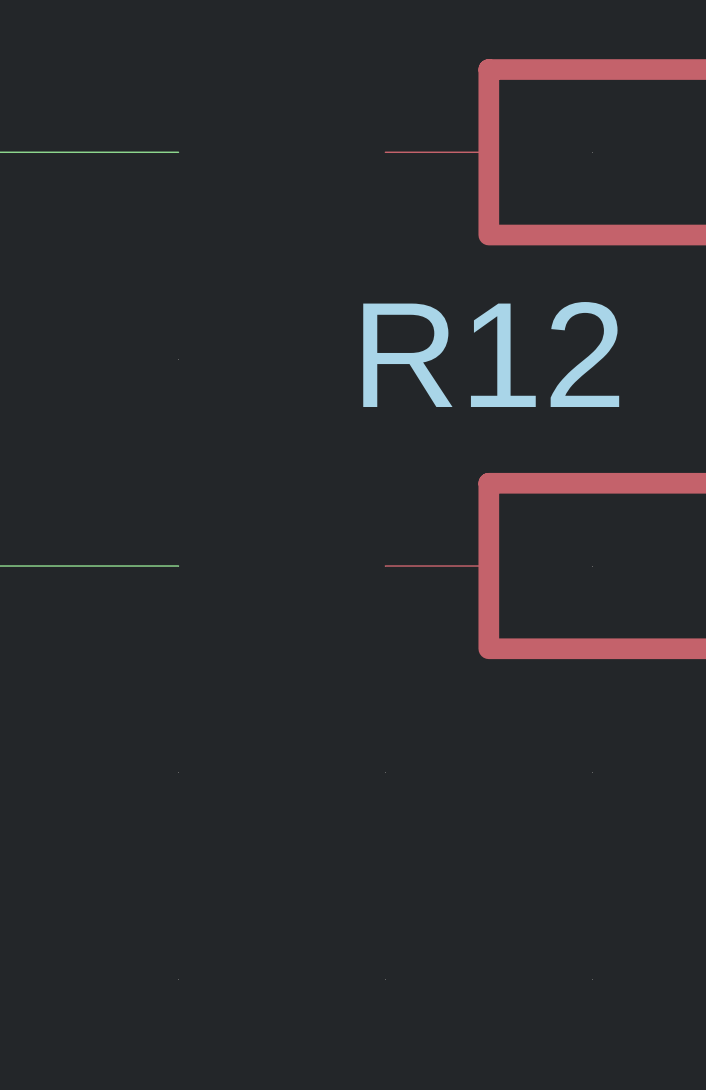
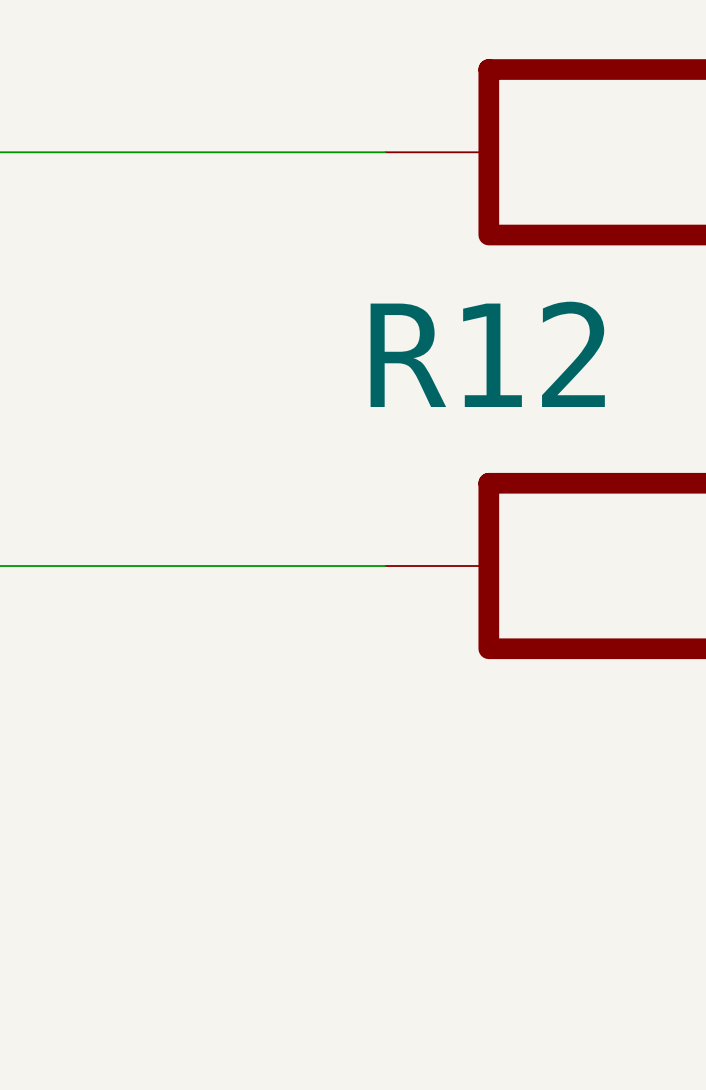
wire: none -> (178, 152) (385, 152)
wire: none -> (178, 566) (385, 566)

